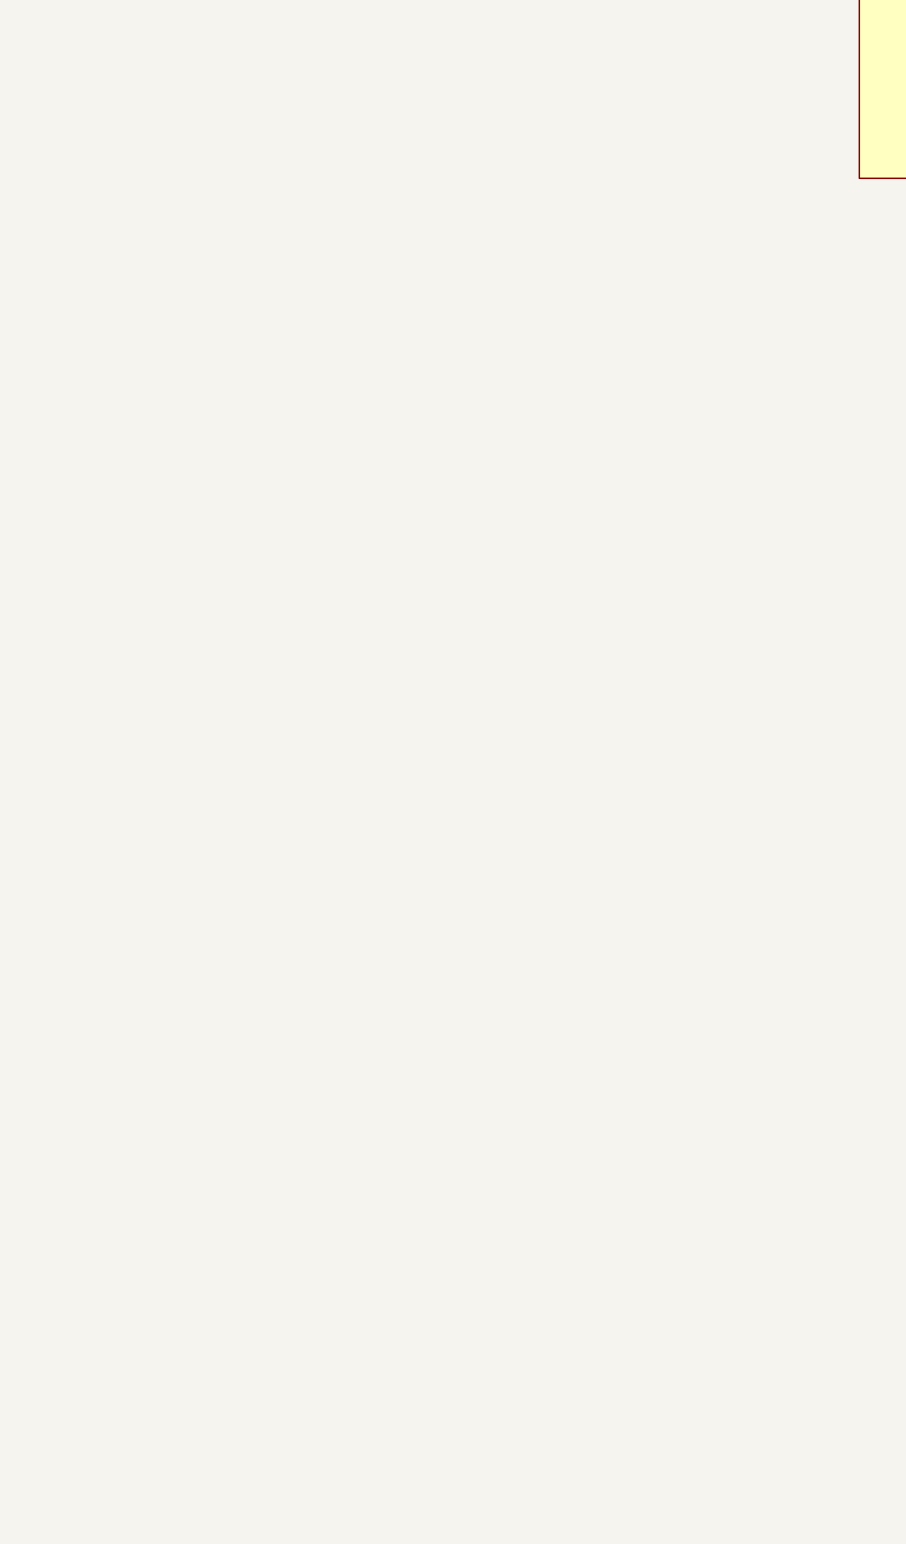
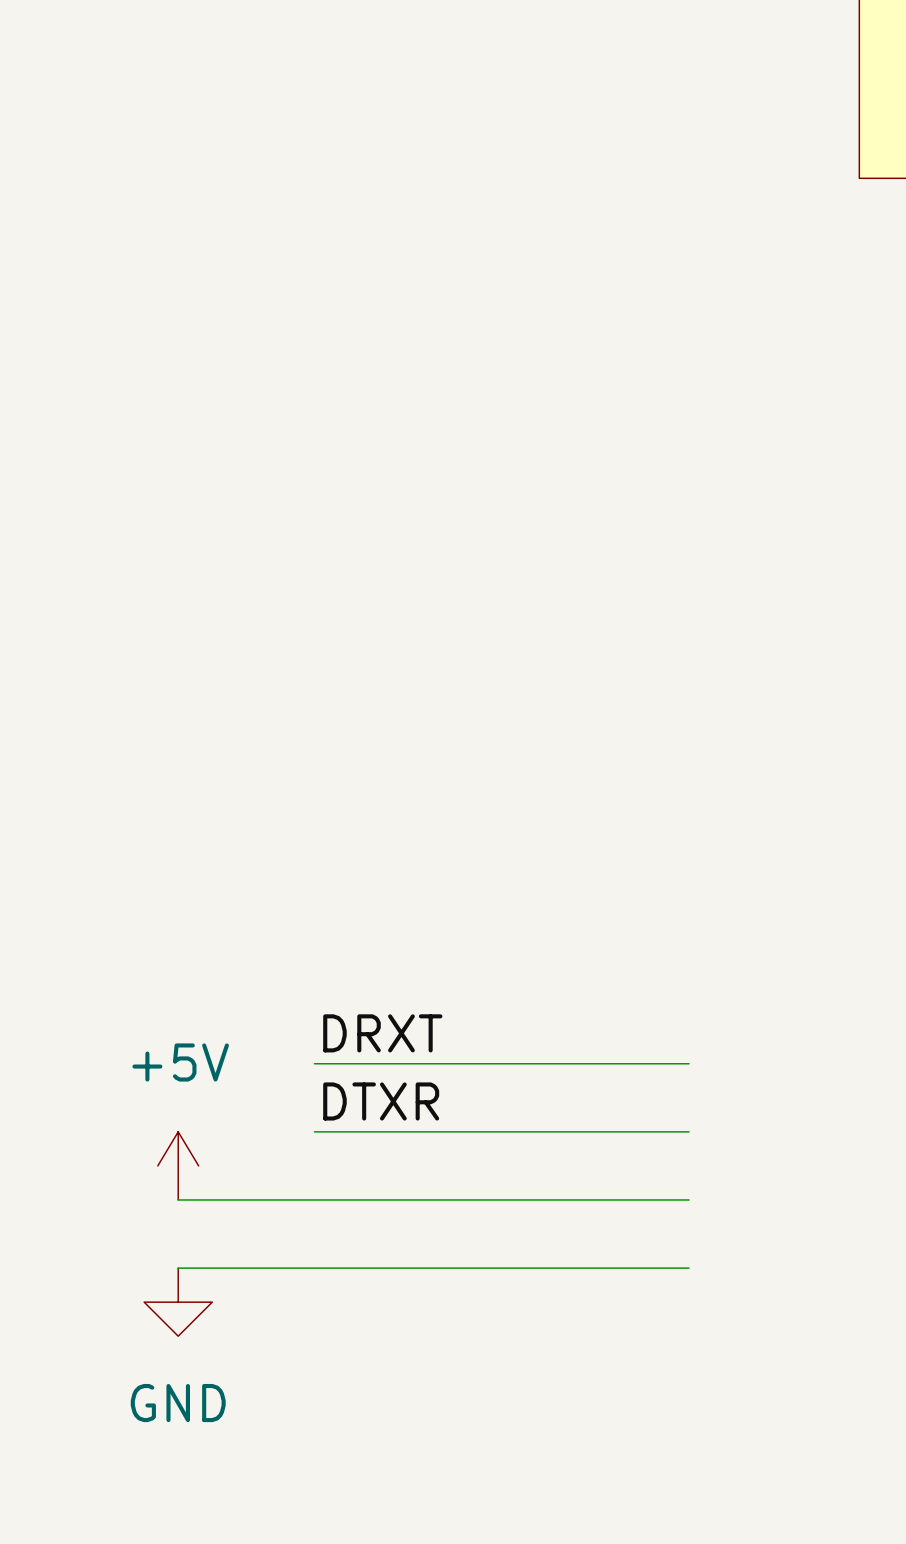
label: none -> DRXT (382, 1033)
wire: none -> (314, 1063) (689, 1063)
label: none -> DTXR (381, 1101)
wire: none -> (314, 1131) (689, 1131)
power symbol: none -> +5V (178, 1165)
wire: none -> (178, 1199) (689, 1199)
wire: none -> (178, 1268) (689, 1268)
power symbol: none -> GND (178, 1302)

